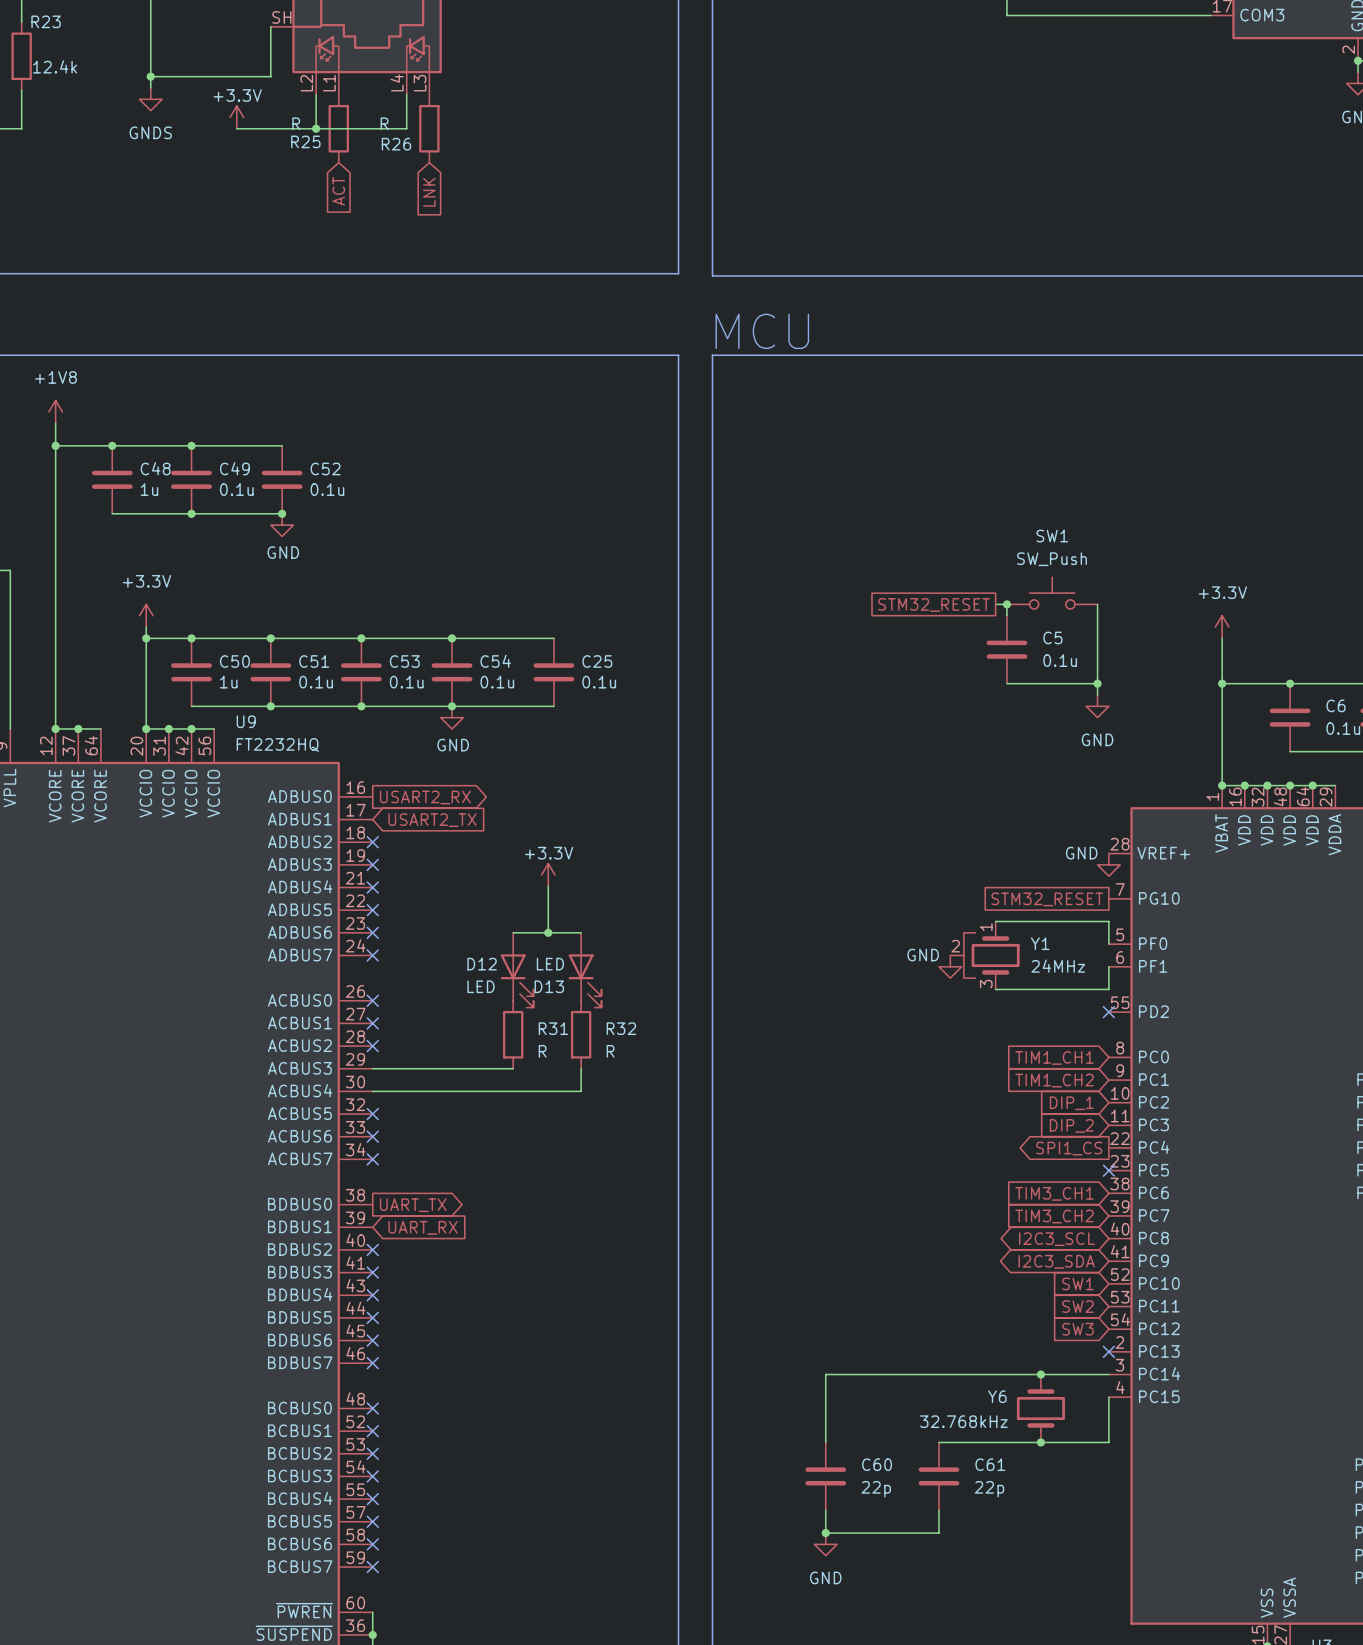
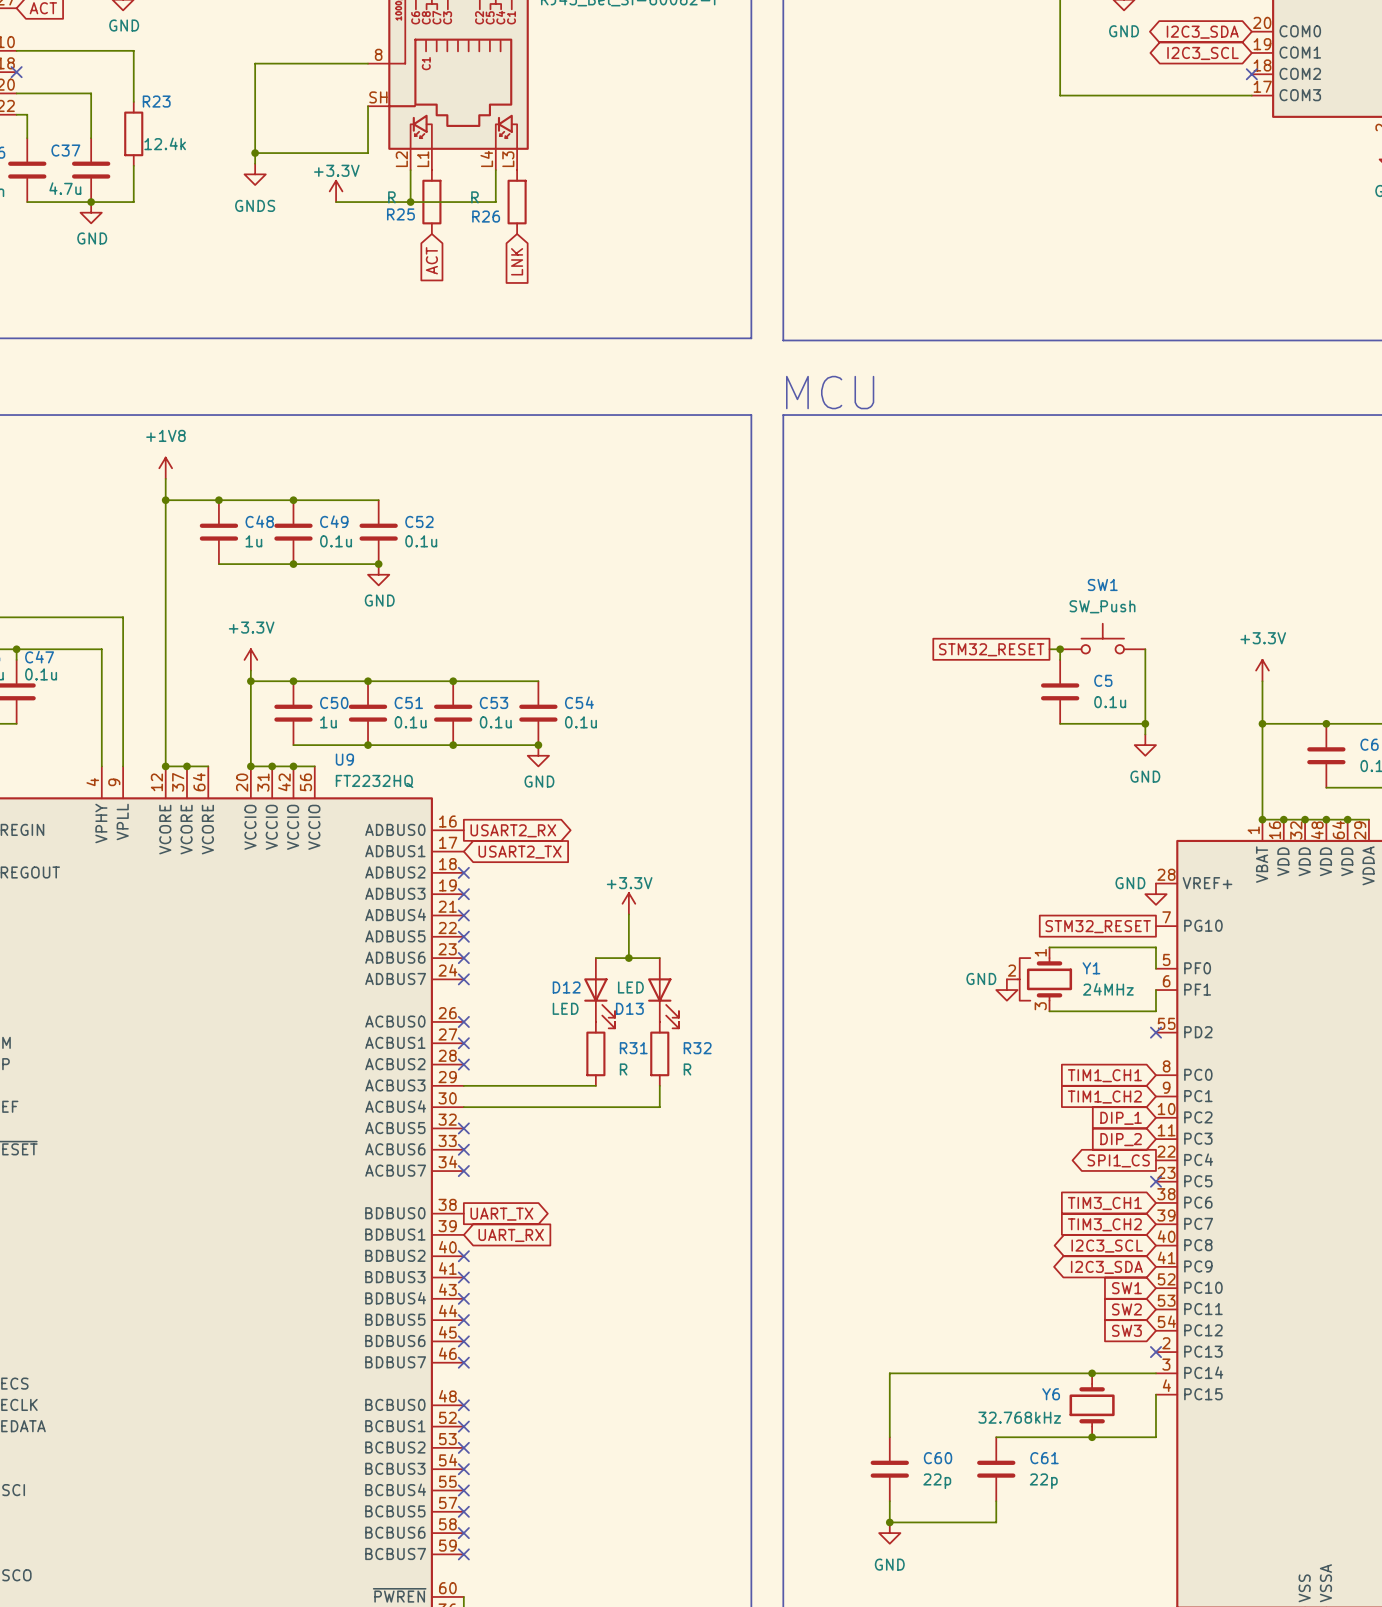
wire: (452, 638) (553, 638) -> none
junction: (452, 638) -> none
C25: 0.1u (553, 672) -> none
wire: (452, 706) (553, 706) -> none

